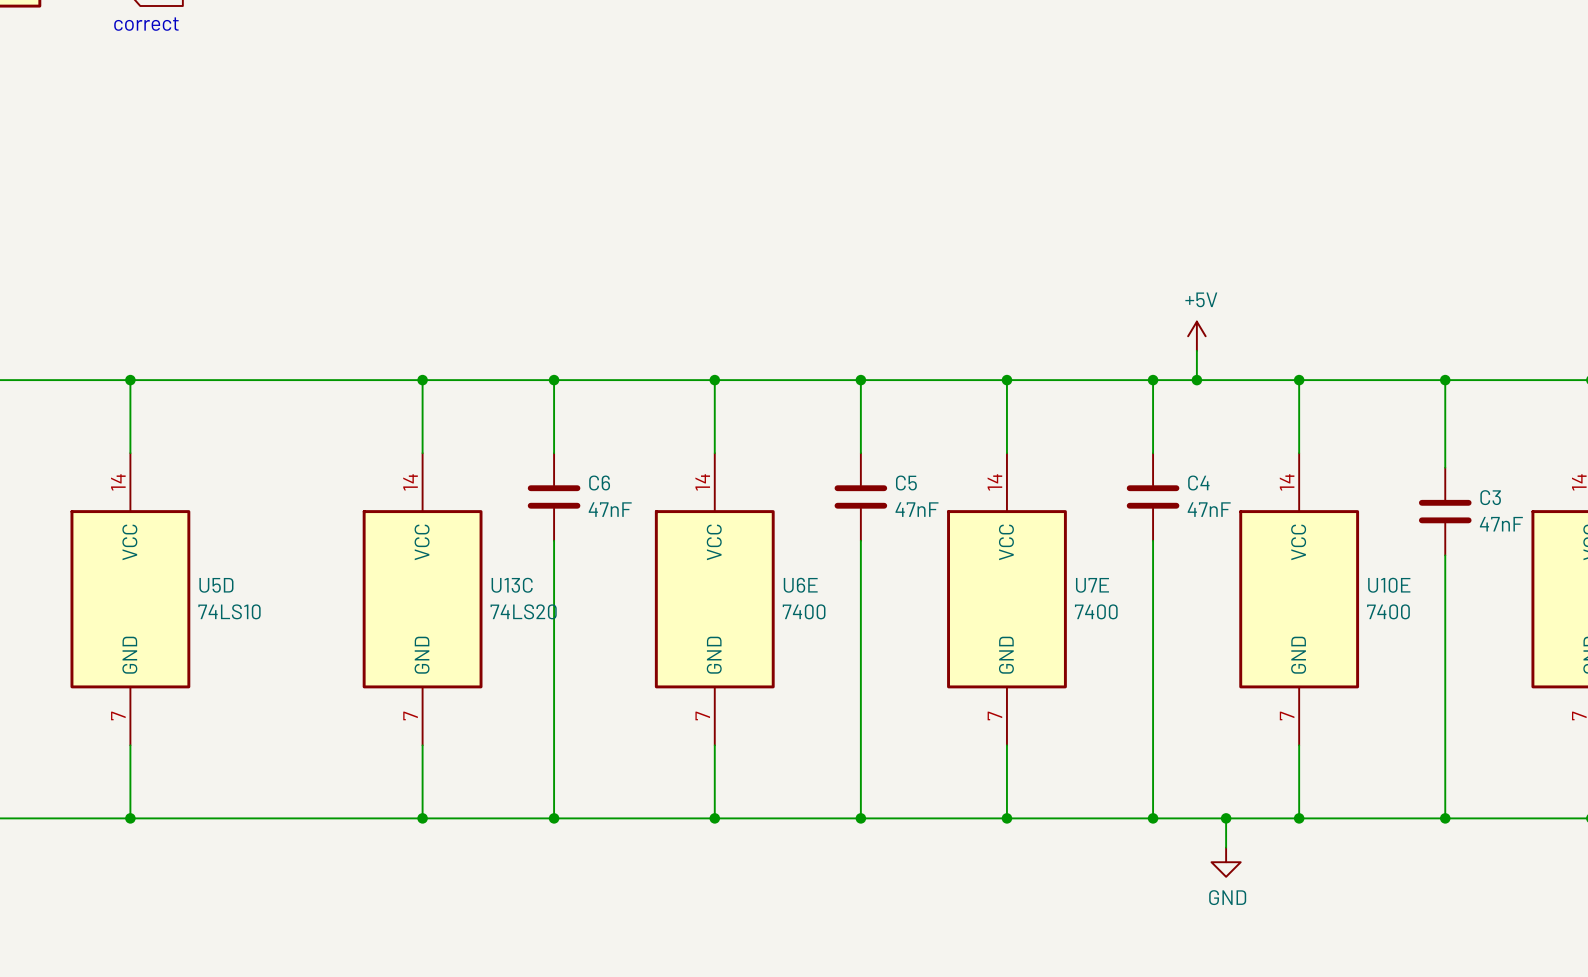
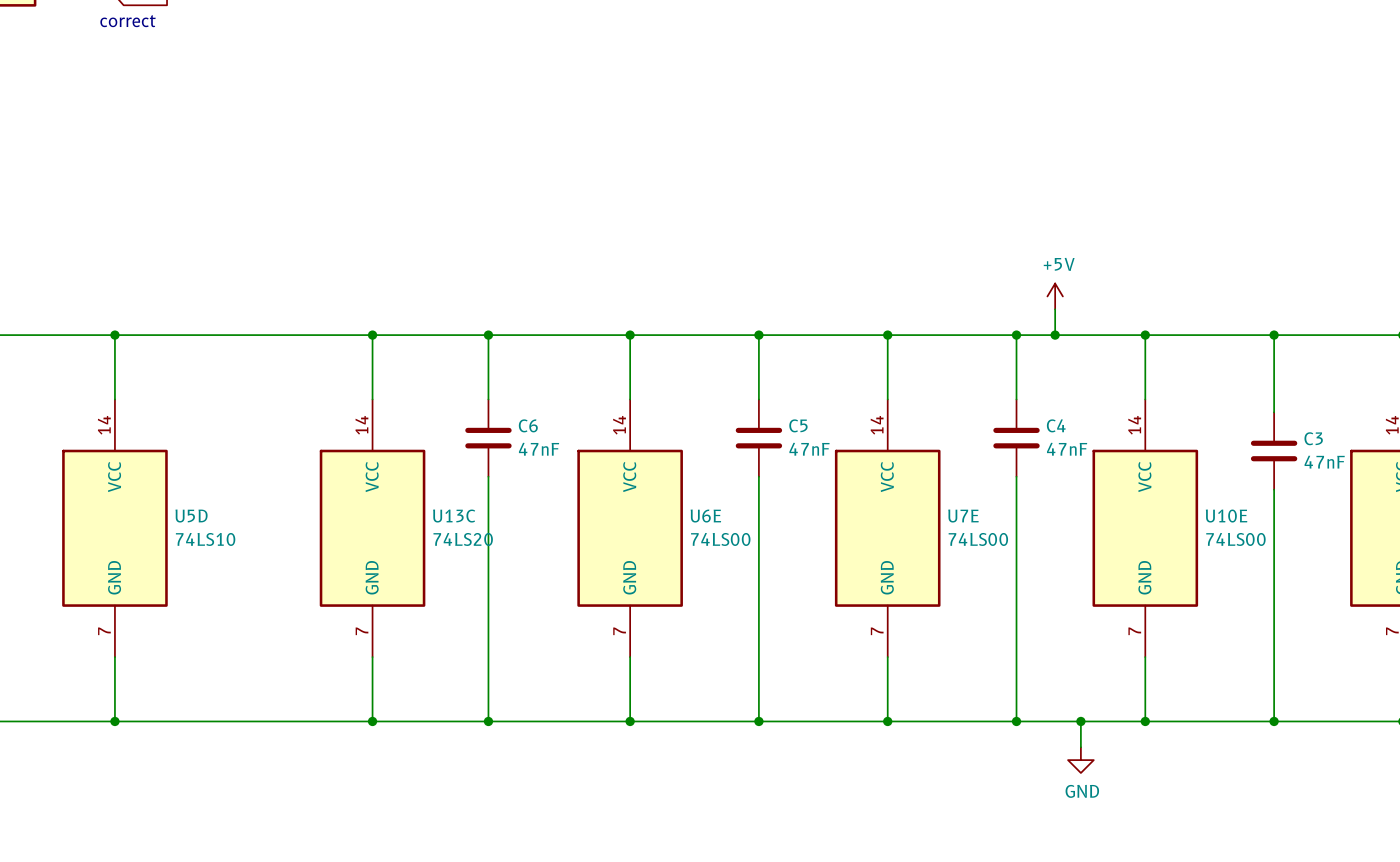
U6E value: 7400 (804, 611) -> 74LS00 (720, 539)
U7E value: 7400 (1096, 611) -> 74LS00 (978, 539)
U10E value: 7400 (1388, 611) -> 74LS00 (1235, 539)

